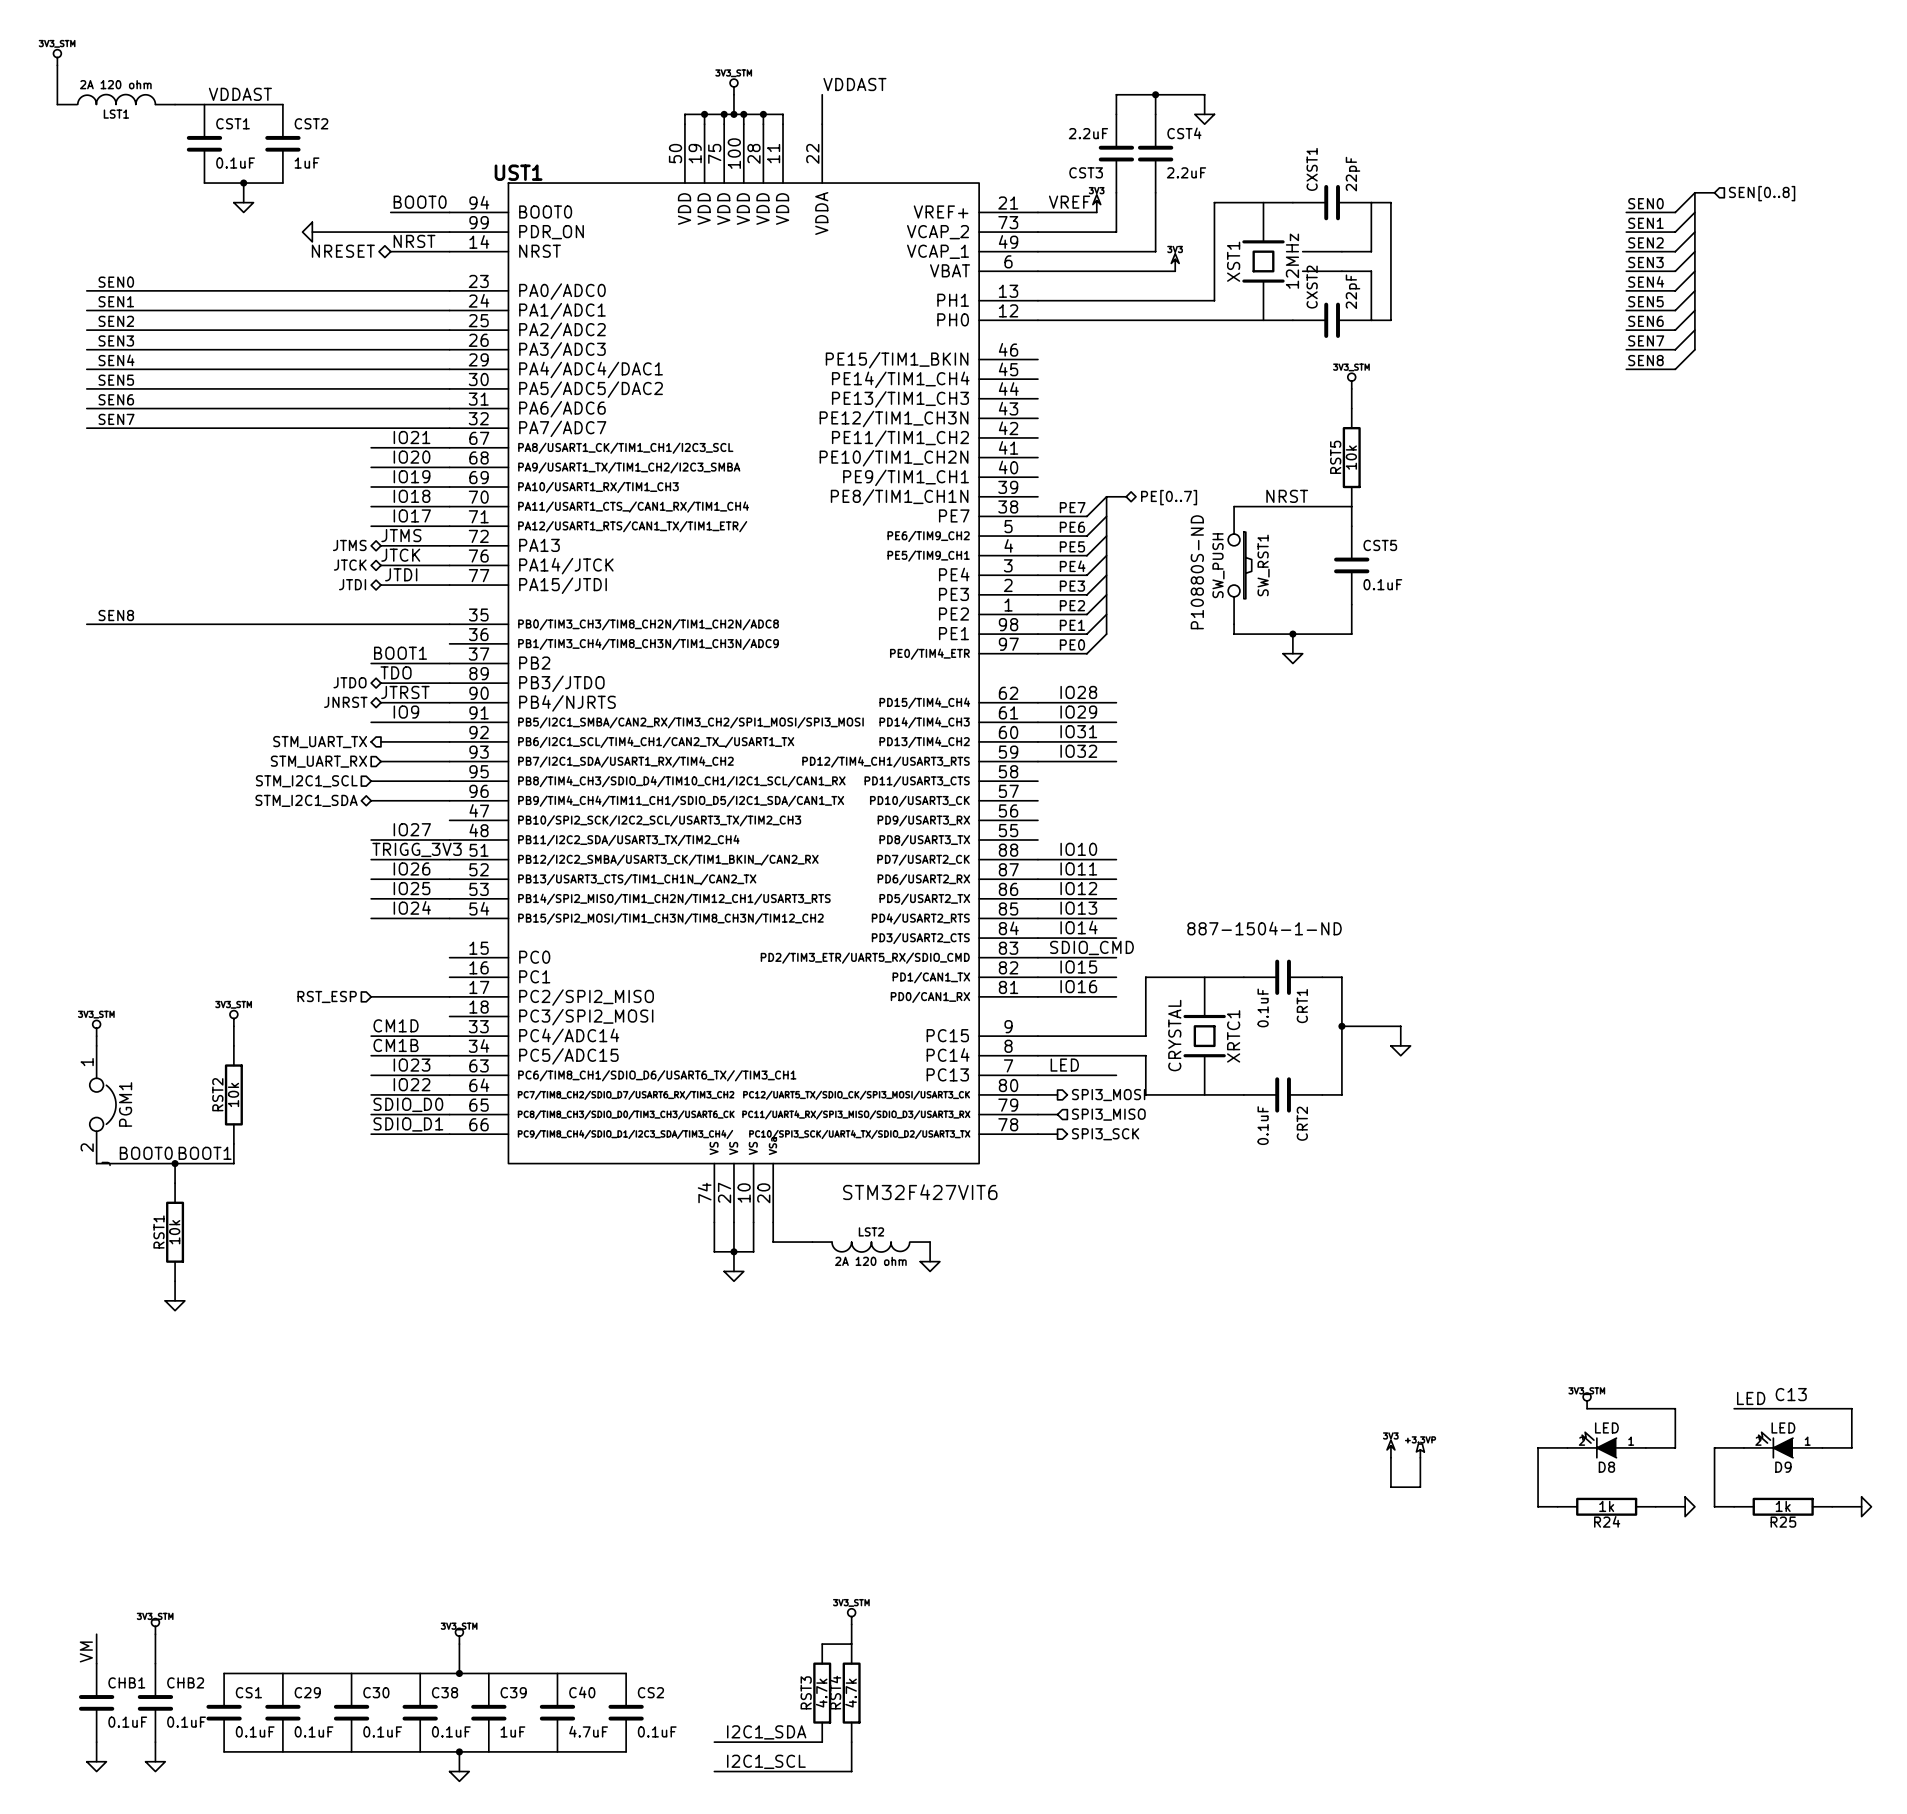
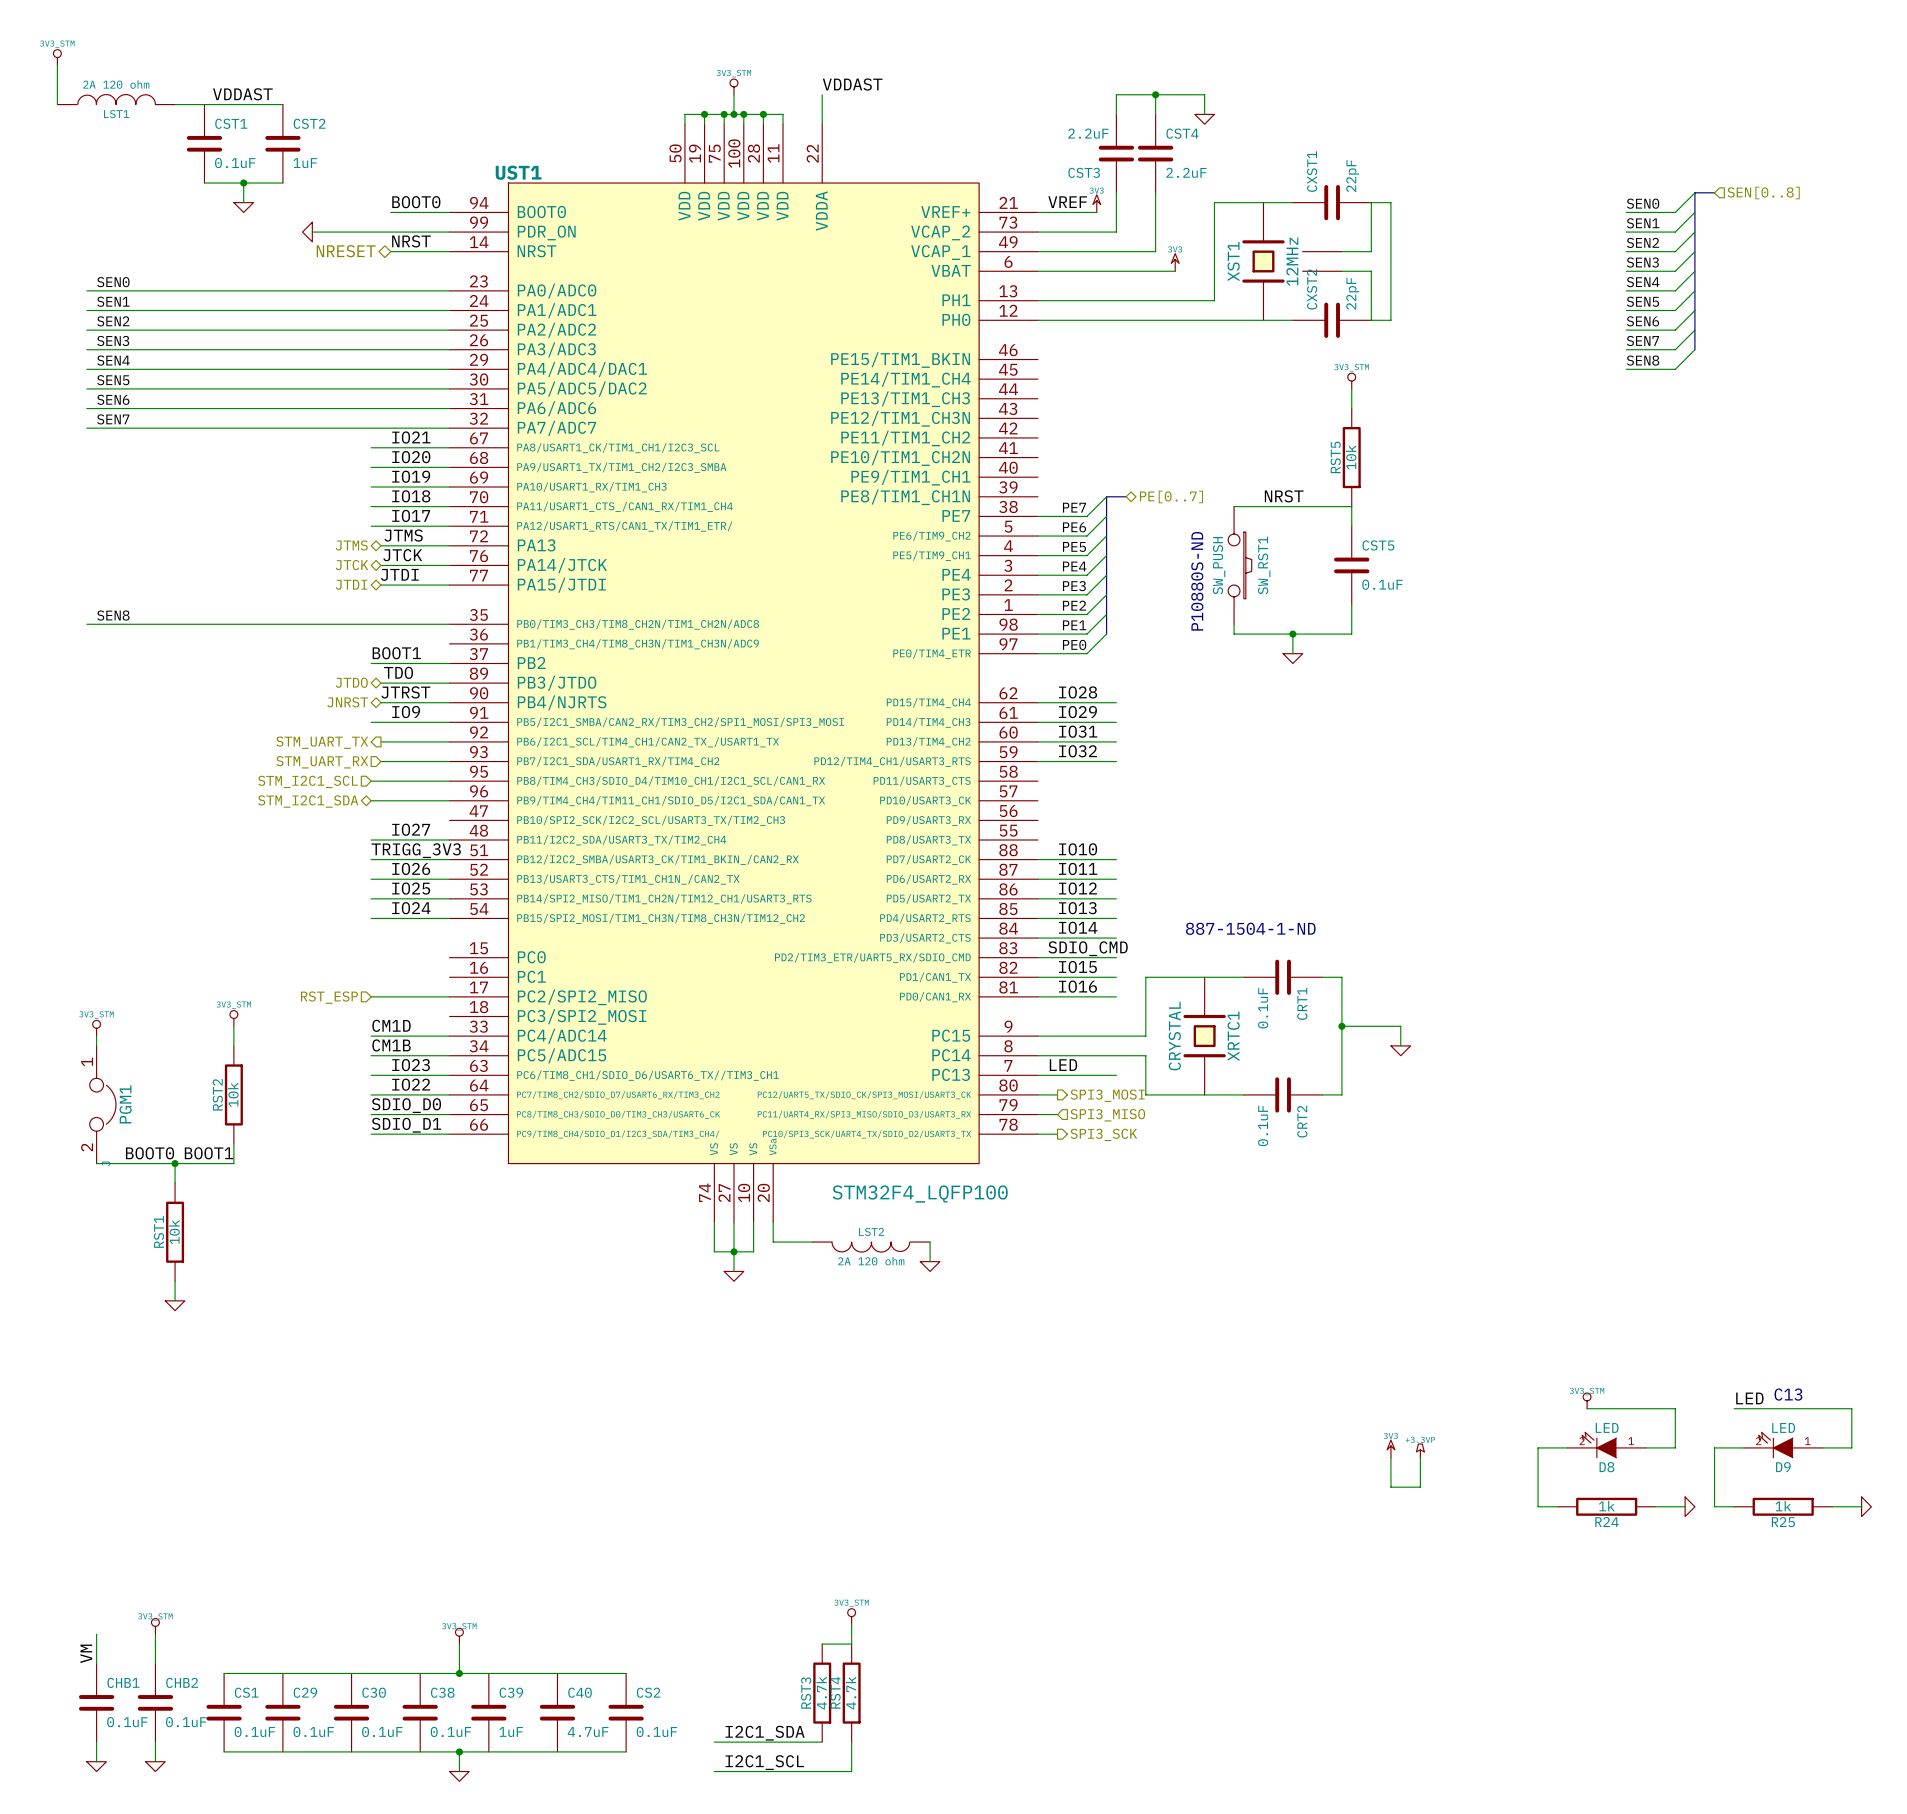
UST1 value: STM32F427VIT6 (920, 1192) -> STM32F4_LQFP100 (920, 1194)

